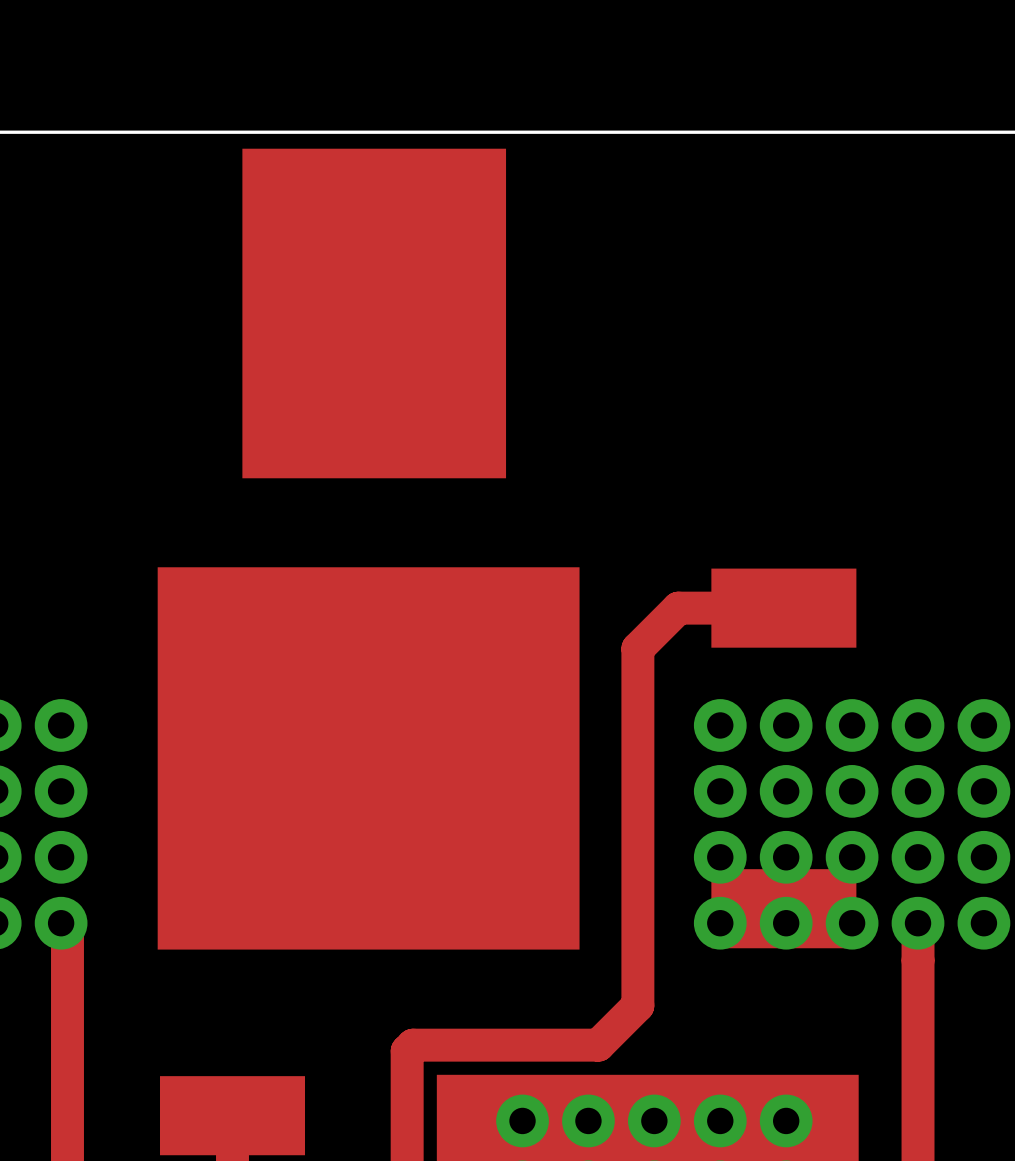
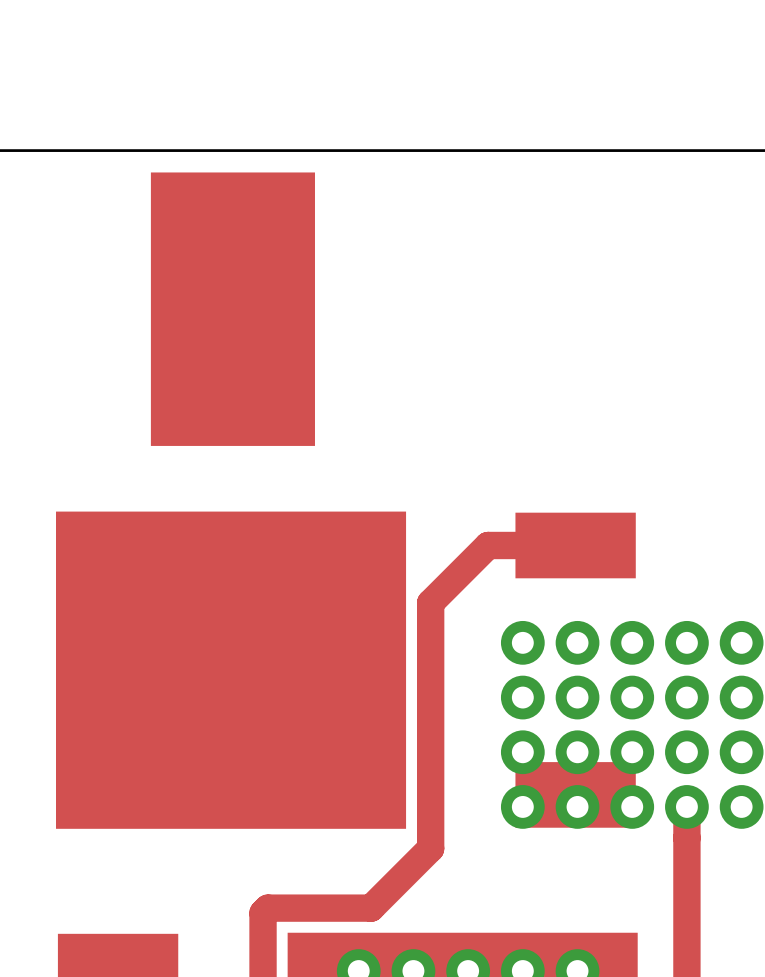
part footprint: [242, 148, 507, 479] -> [150, 172, 315, 446]
top track: (637, 648) (637, 1005) (598, 1045) (537, 1045) -> (454, 579) (430, 602) (430, 848) (371, 908)

